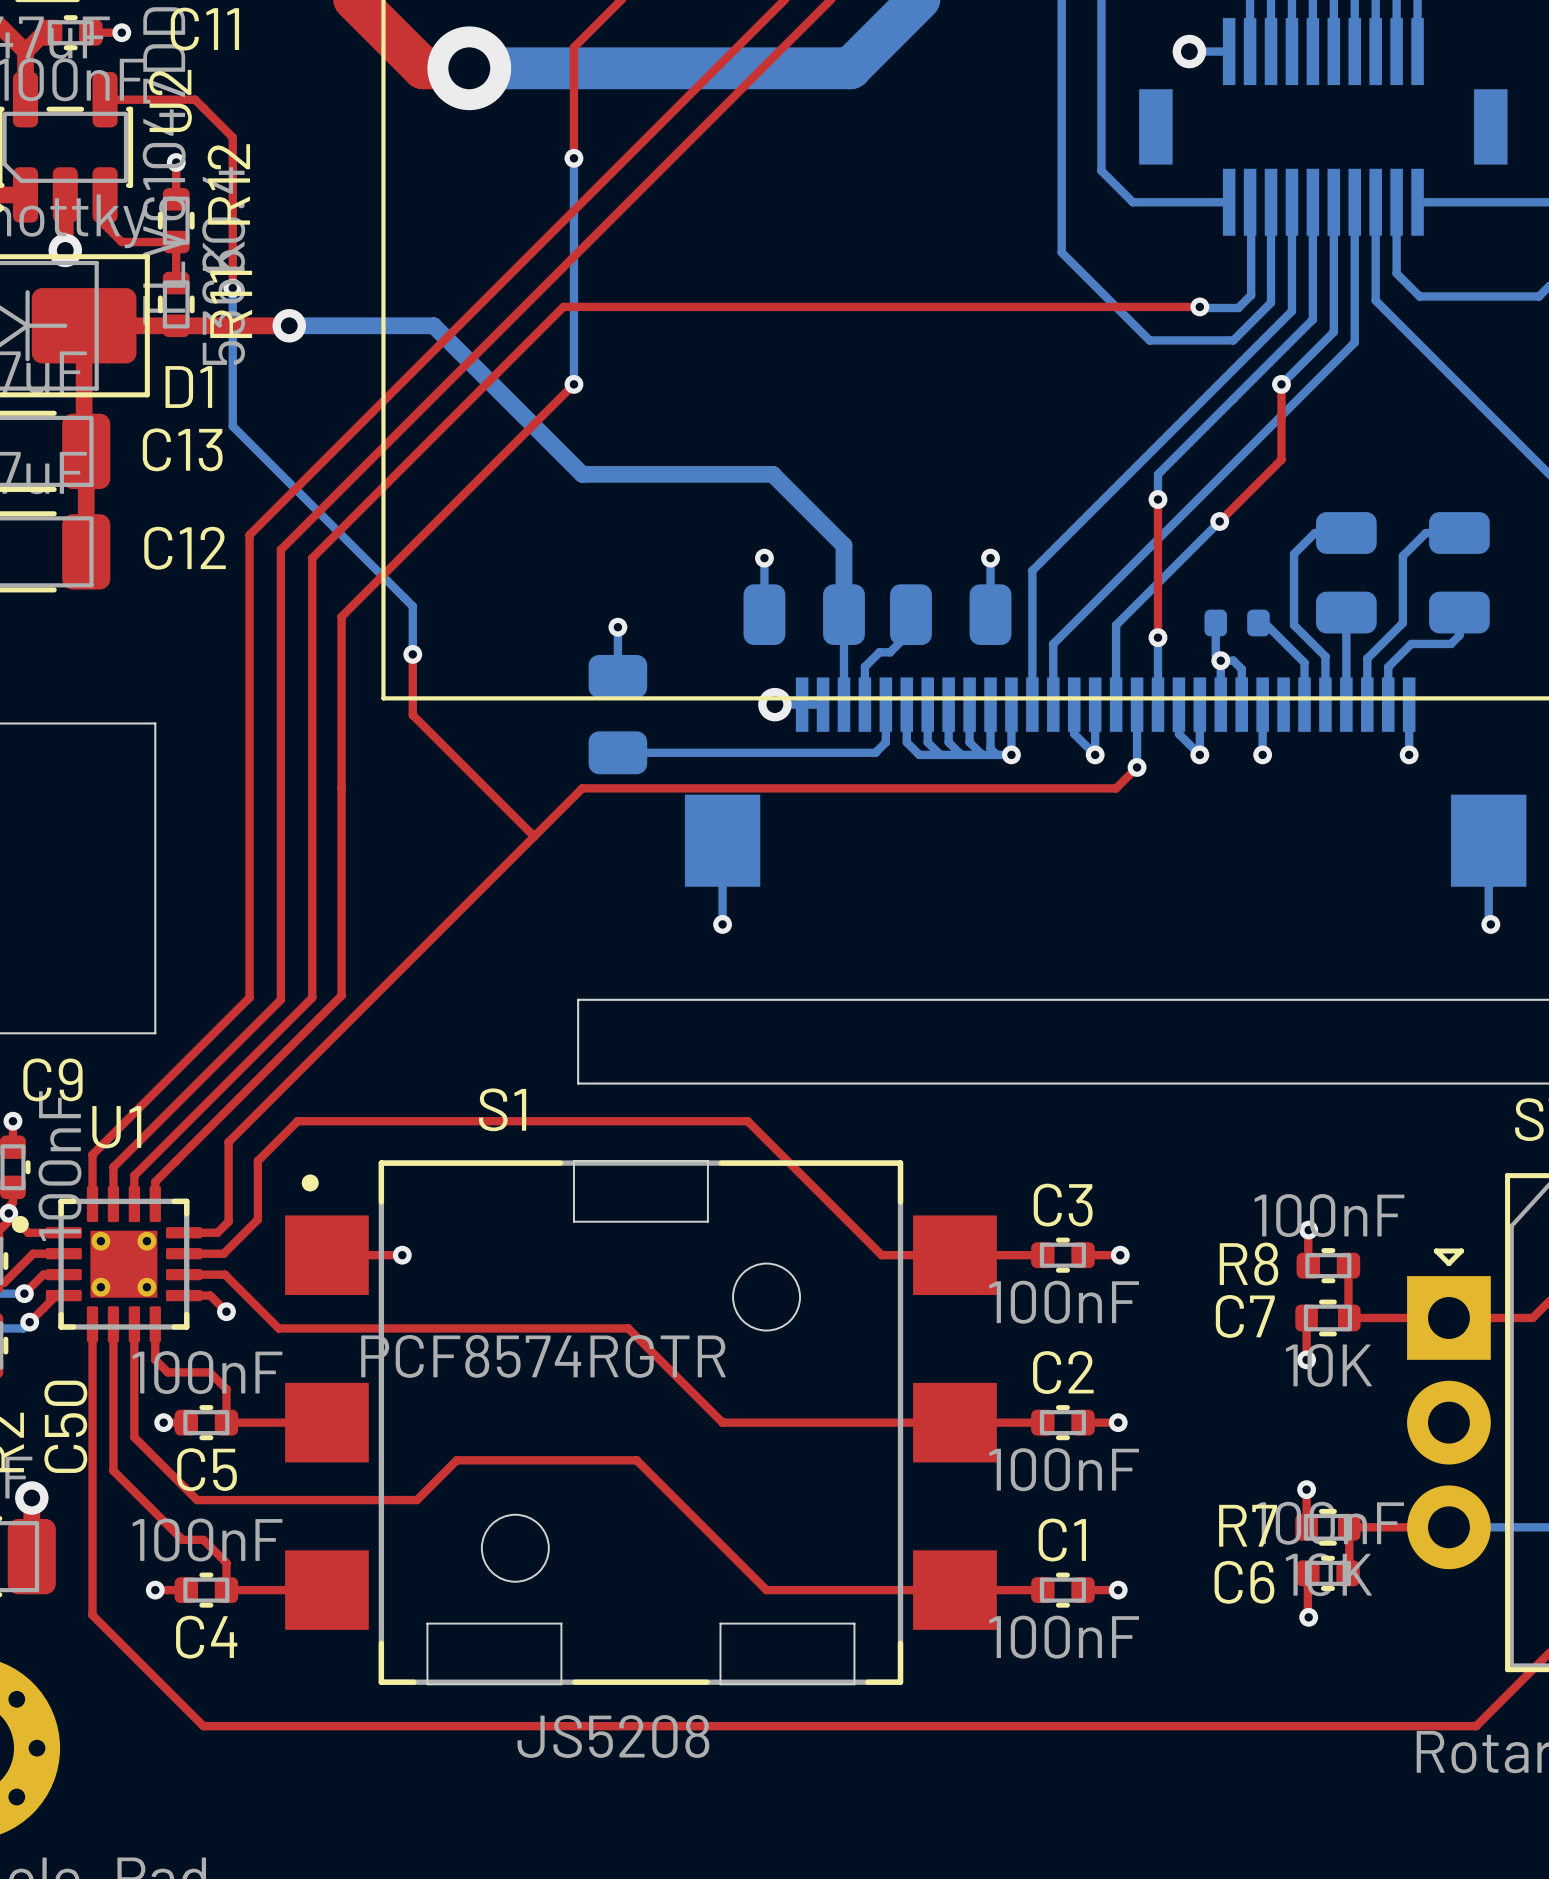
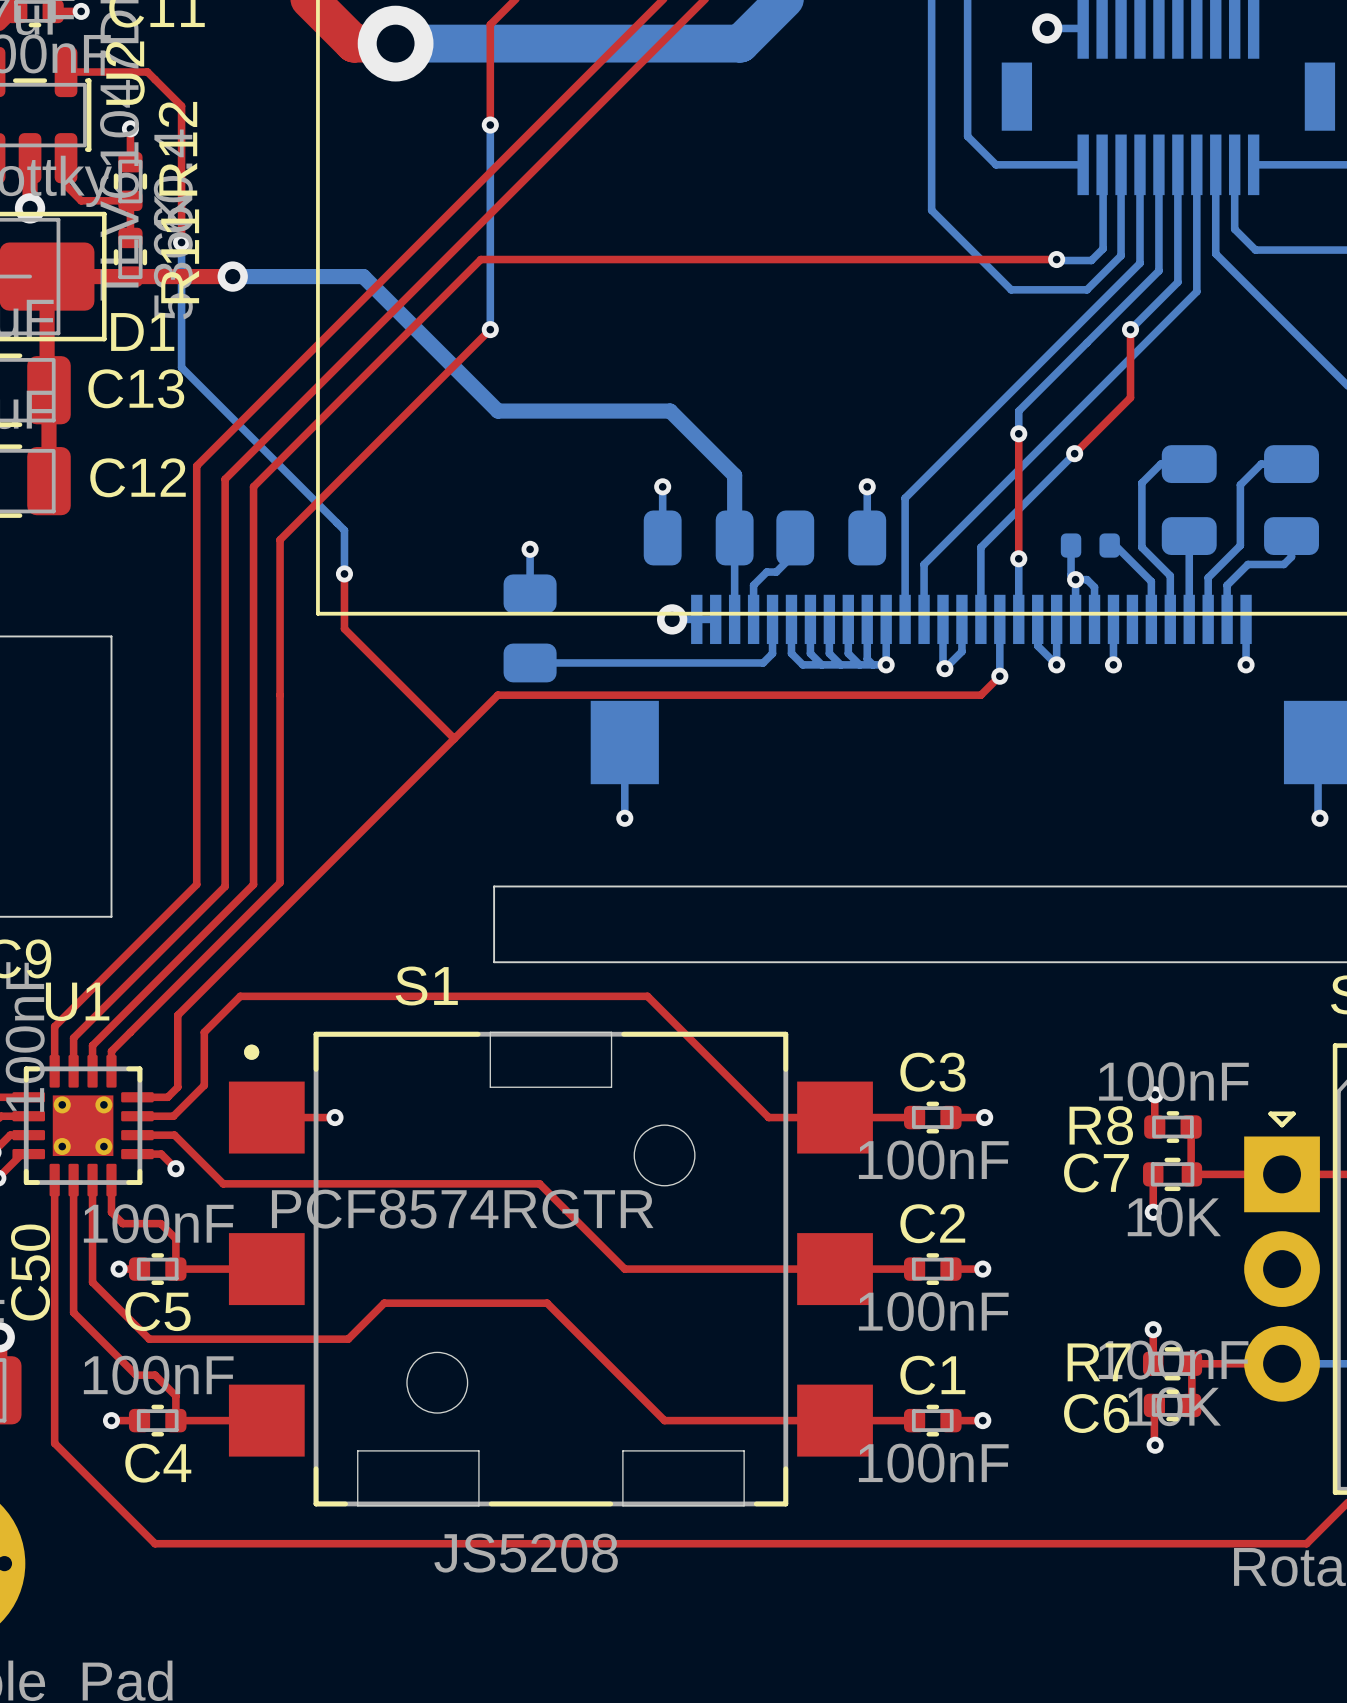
bottom track: (1074, 733) (1095, 754) (1095, 740) -> (943, 645) (943, 666) (944, 668) (961, 651)
via position: (1095, 754) -> (944, 668)

